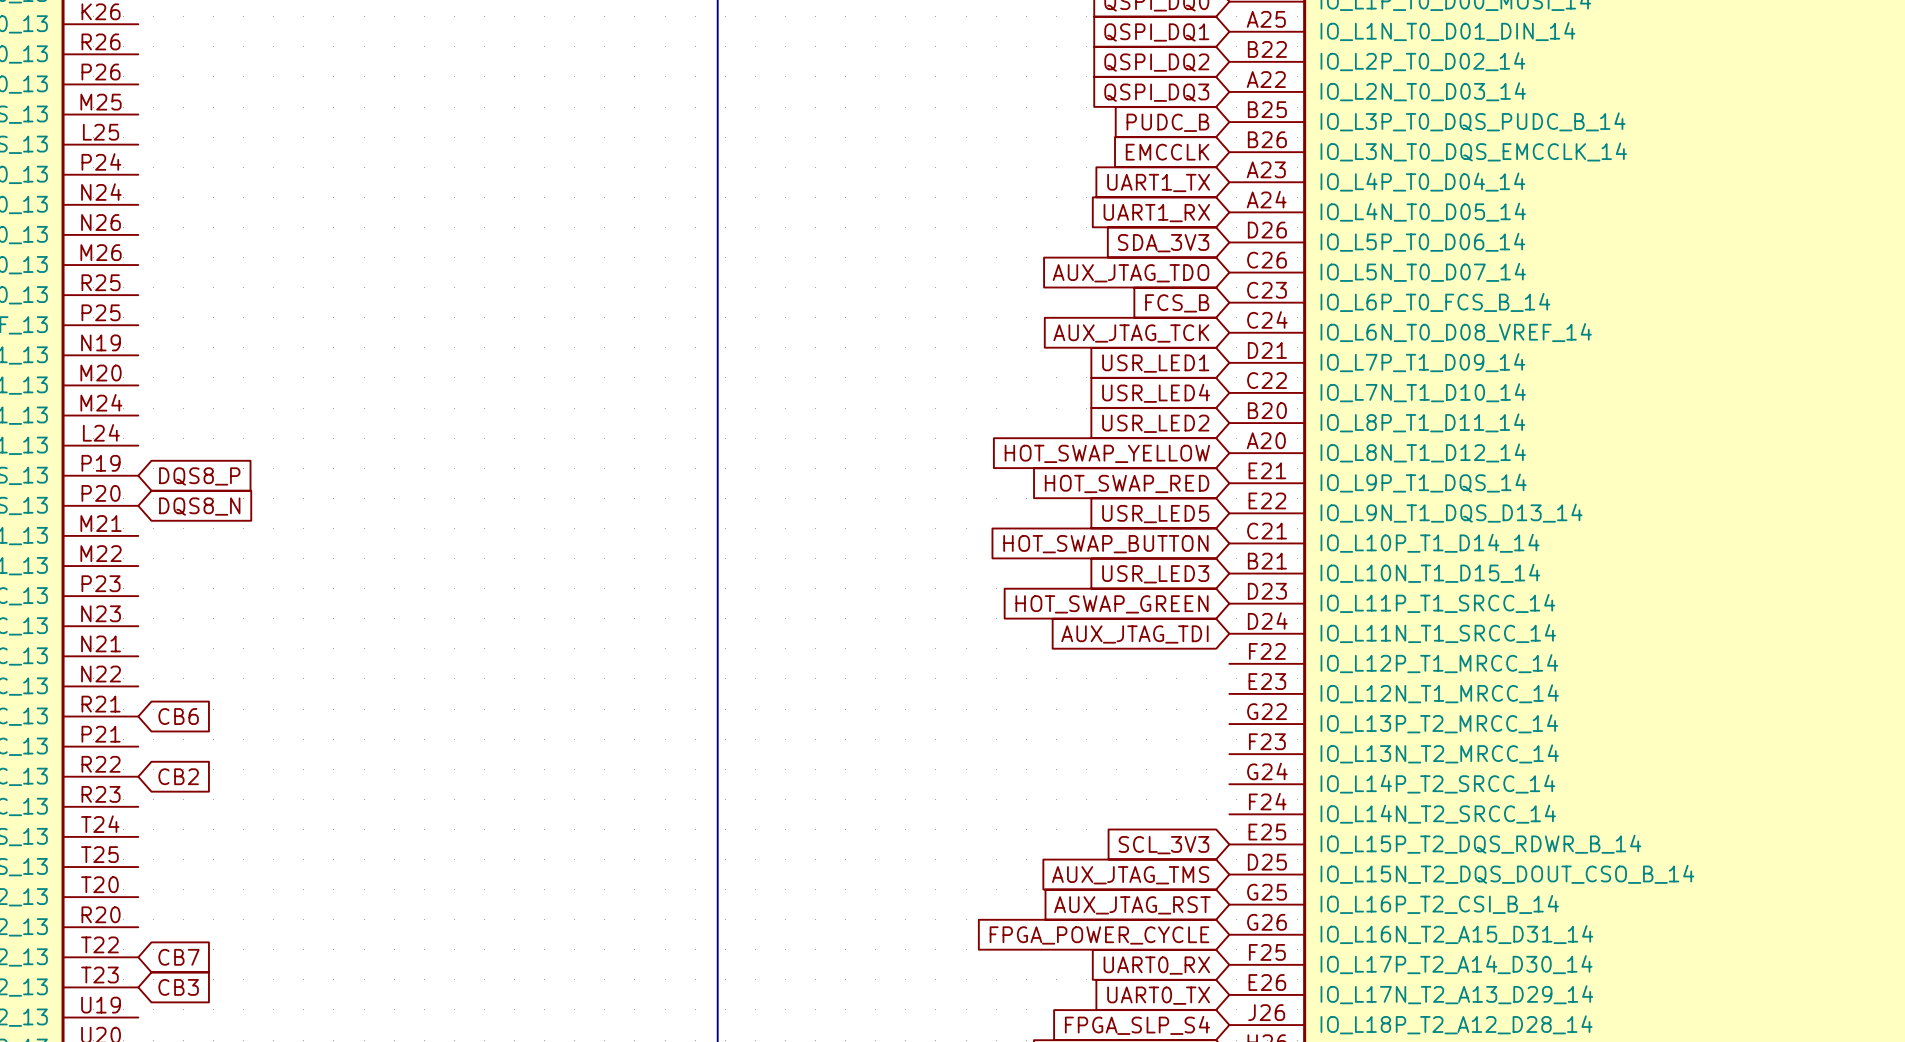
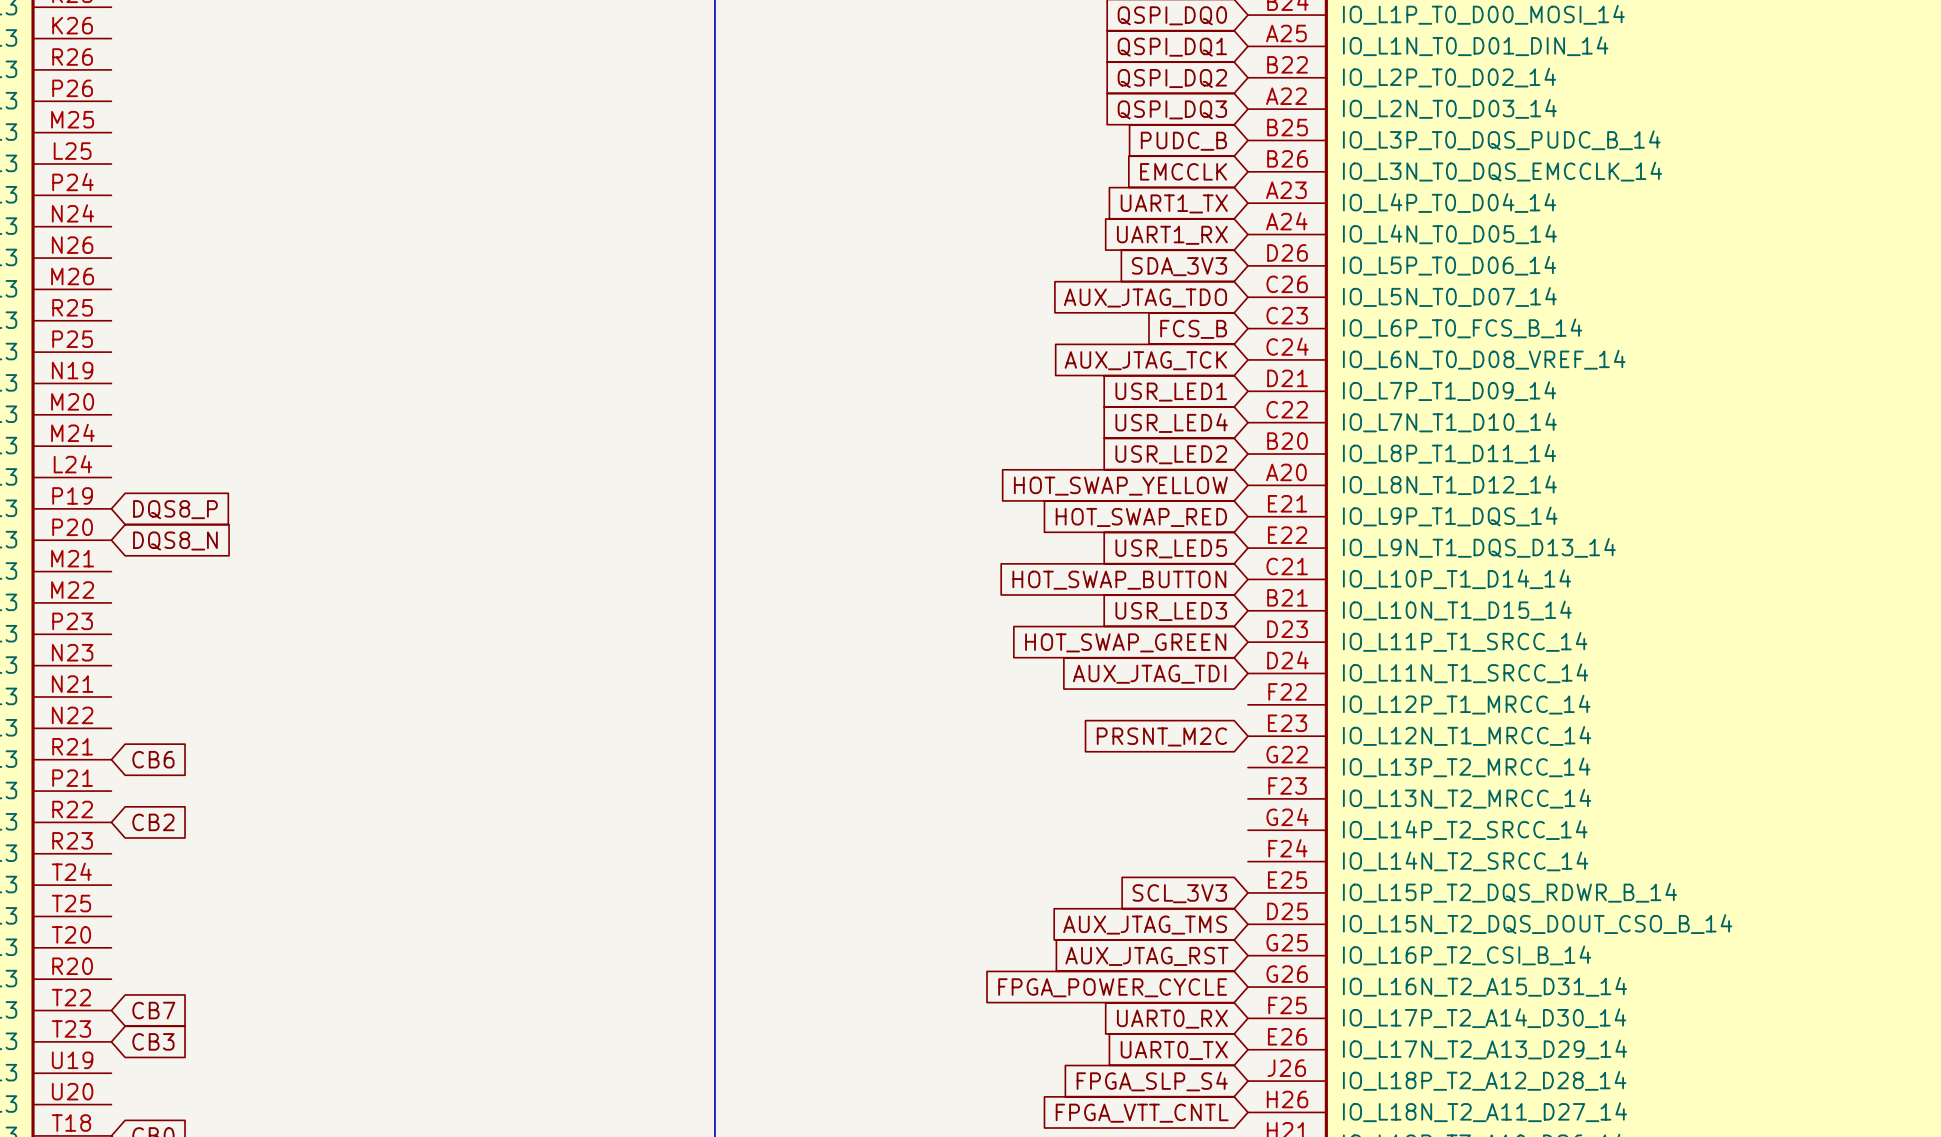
global label: none -> PRSNT_M2C (1161, 736)

